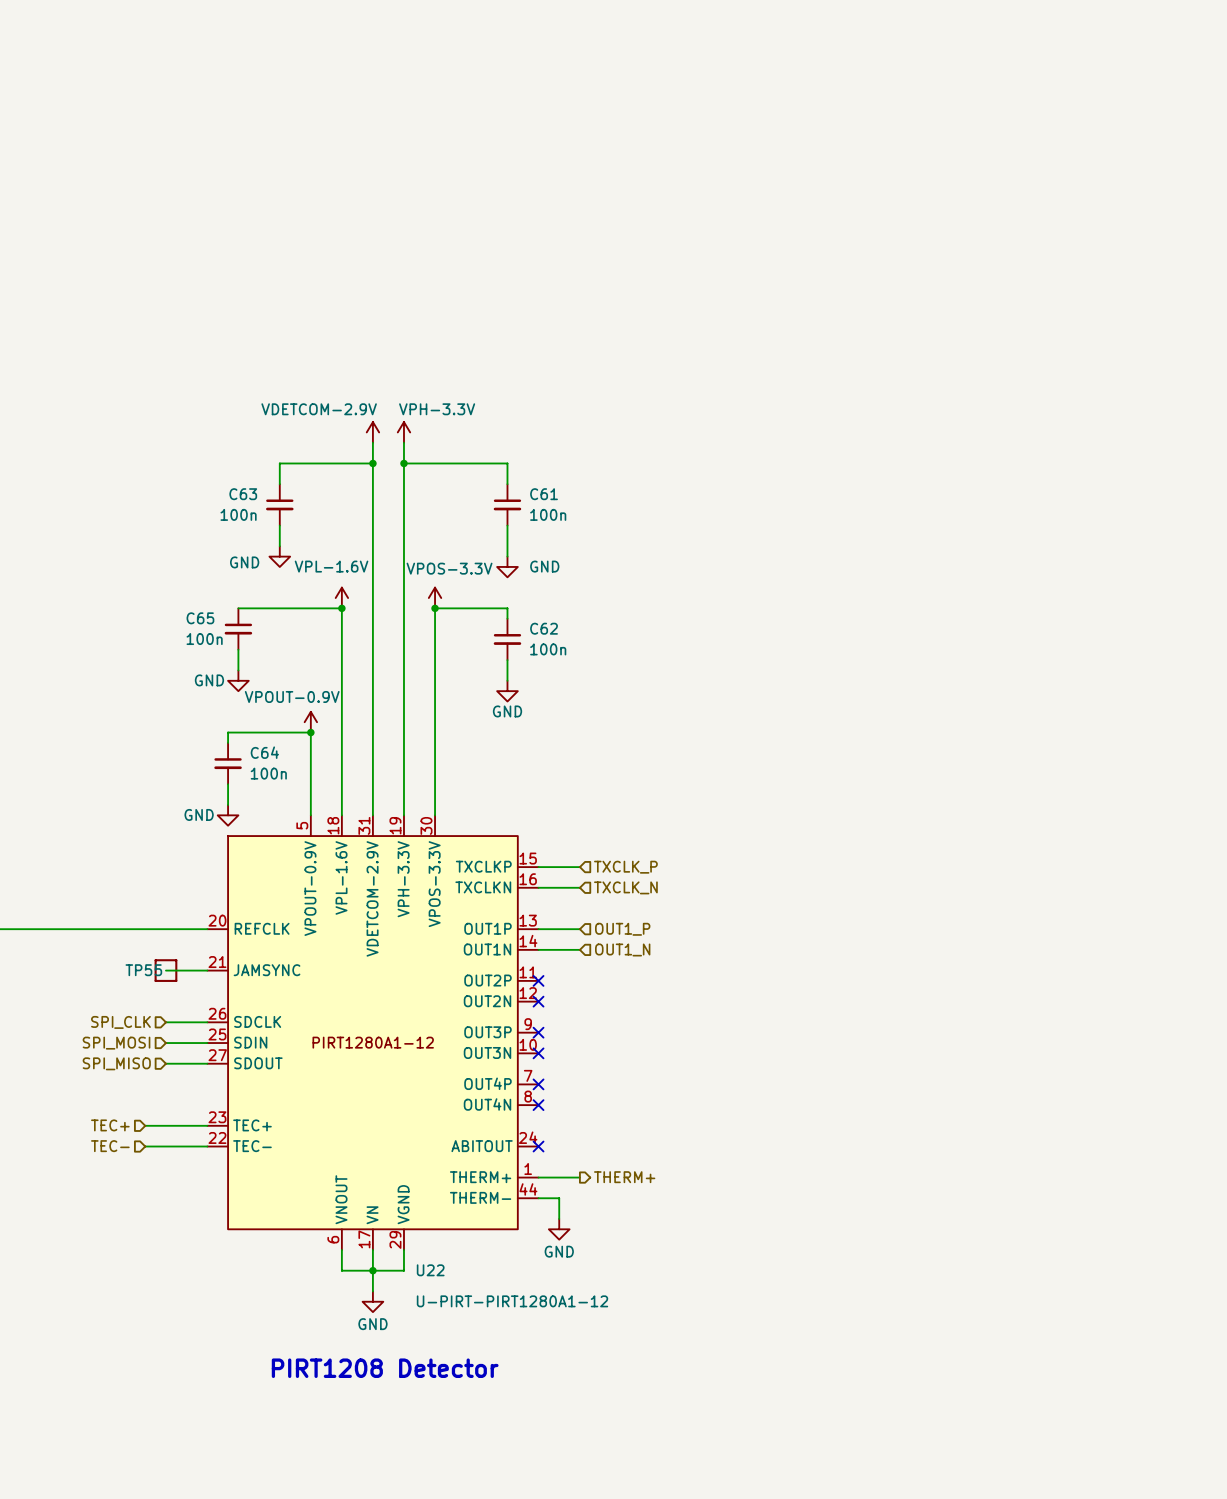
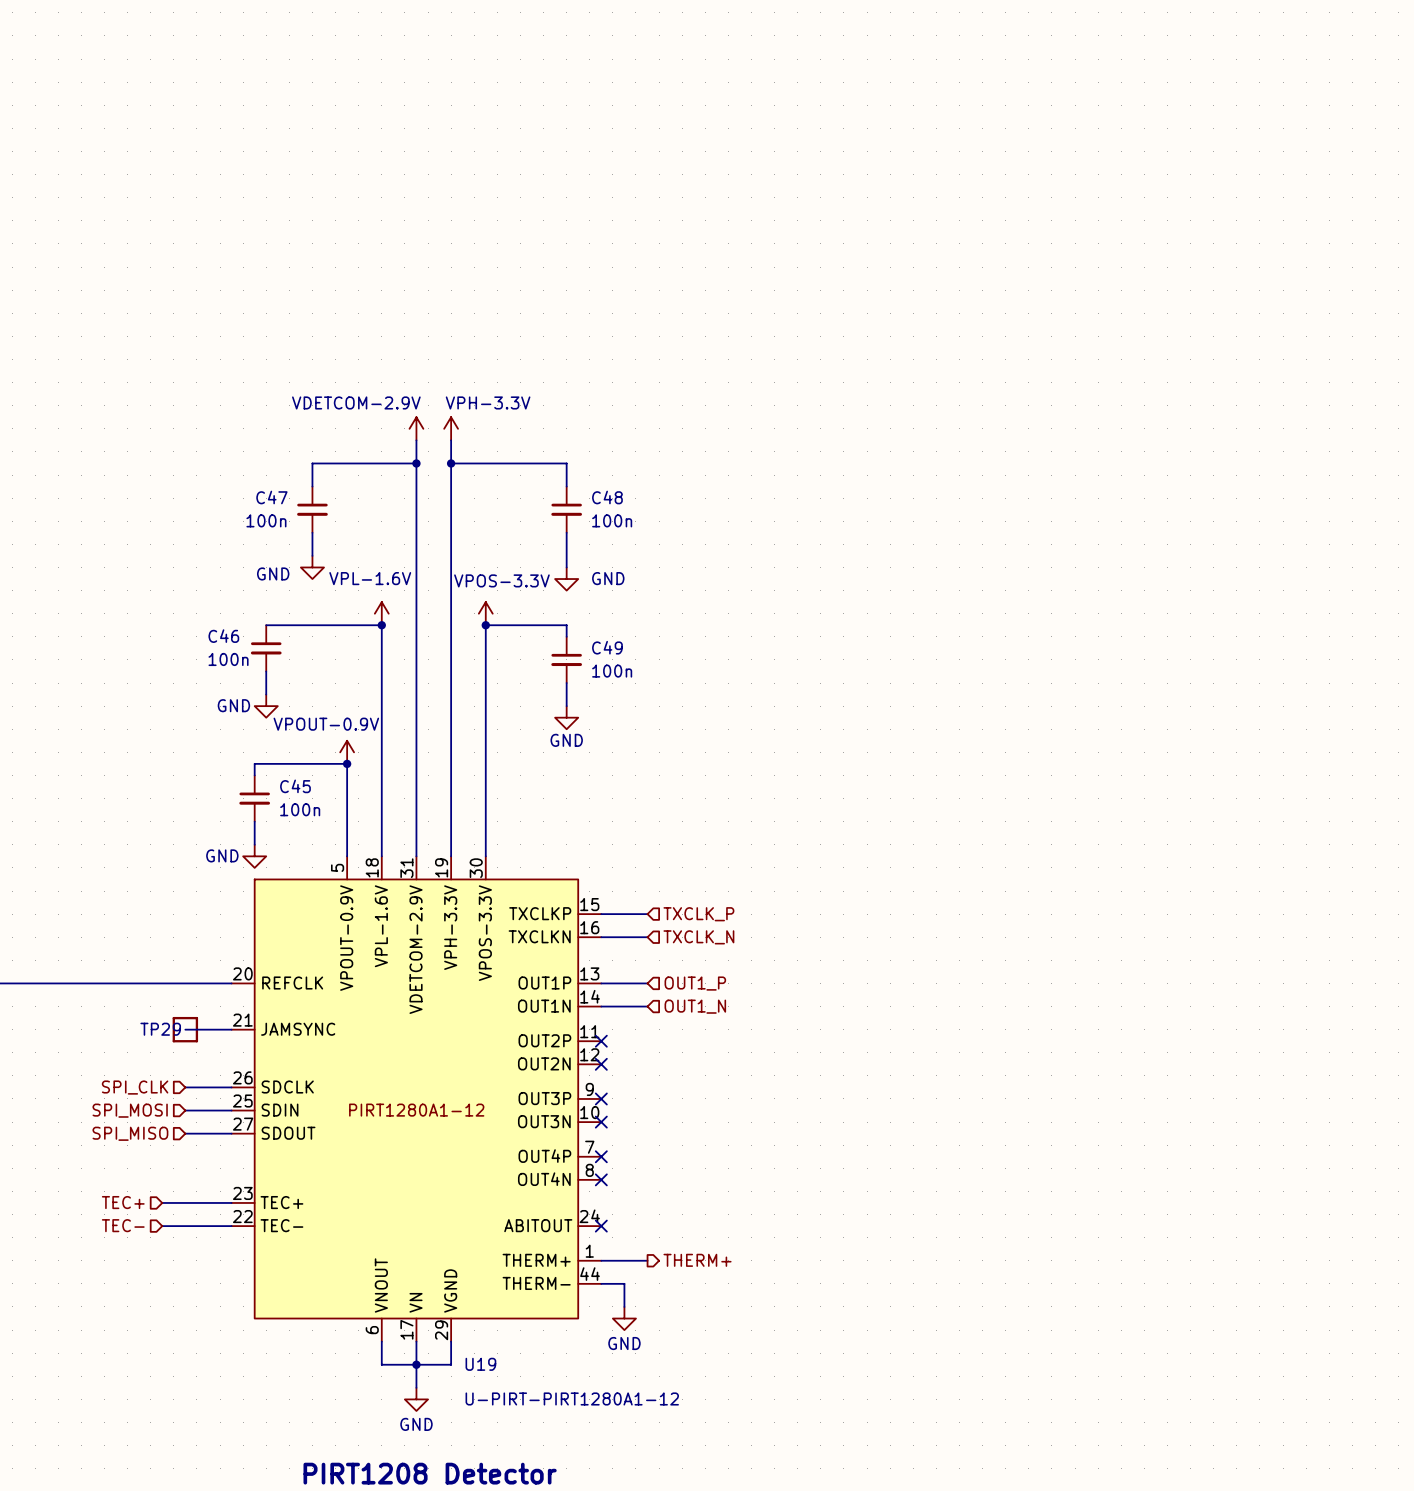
C63 name: C63 (243, 494) -> C47 (271, 497)
C61 name: C61 (544, 494) -> C48 (607, 497)
C65 name: C65 (200, 618) -> C46 (223, 636)
C62 name: C62 (544, 628) -> C49 (607, 647)
C64 name: C64 (264, 752) -> C45 (295, 786)
TP55 name: TP55 (143, 970) -> TP29 (160, 1029)
U22 name: U22 (430, 1270) -> U19 (480, 1364)

